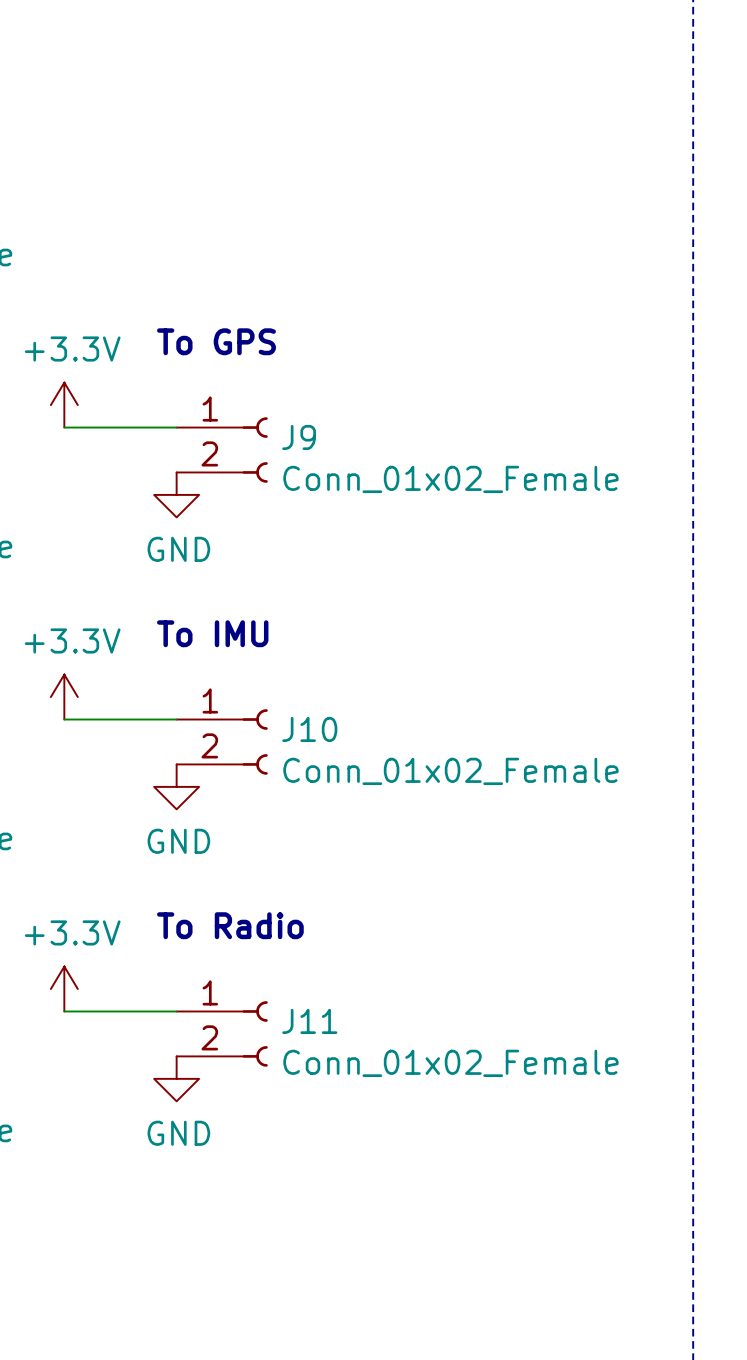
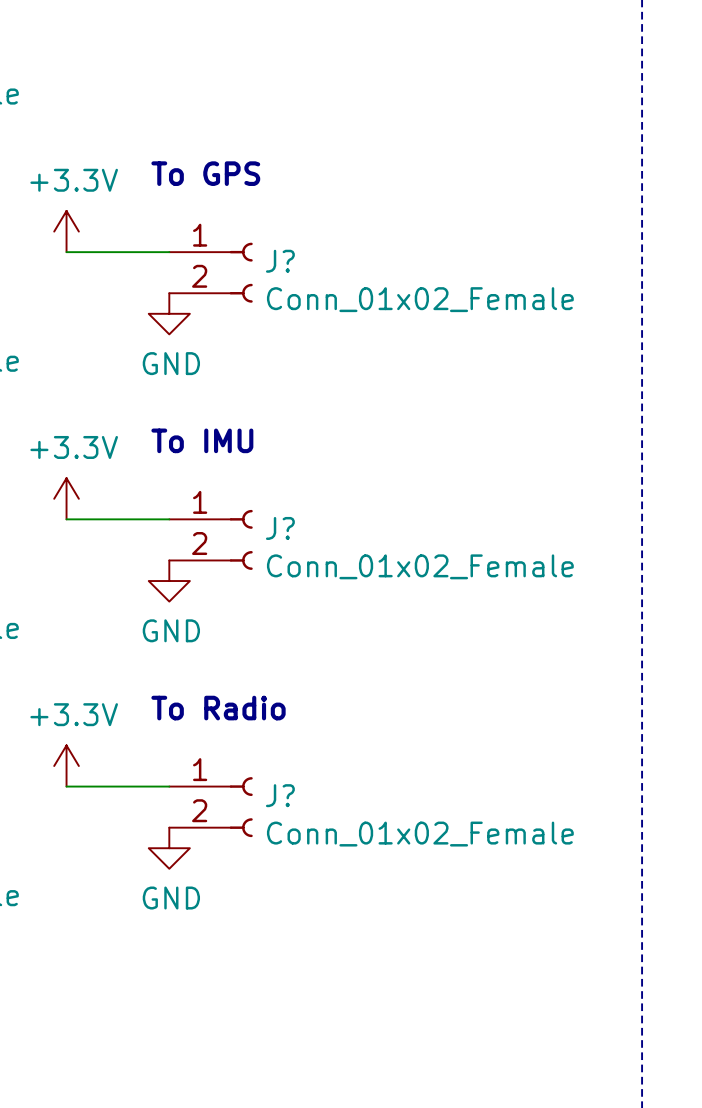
J9 name: J9 (299, 437) -> J? (280, 261)
J10 name: J10 (309, 729) -> J? (280, 528)
J11 name: J11 (309, 1021) -> J? (280, 795)

